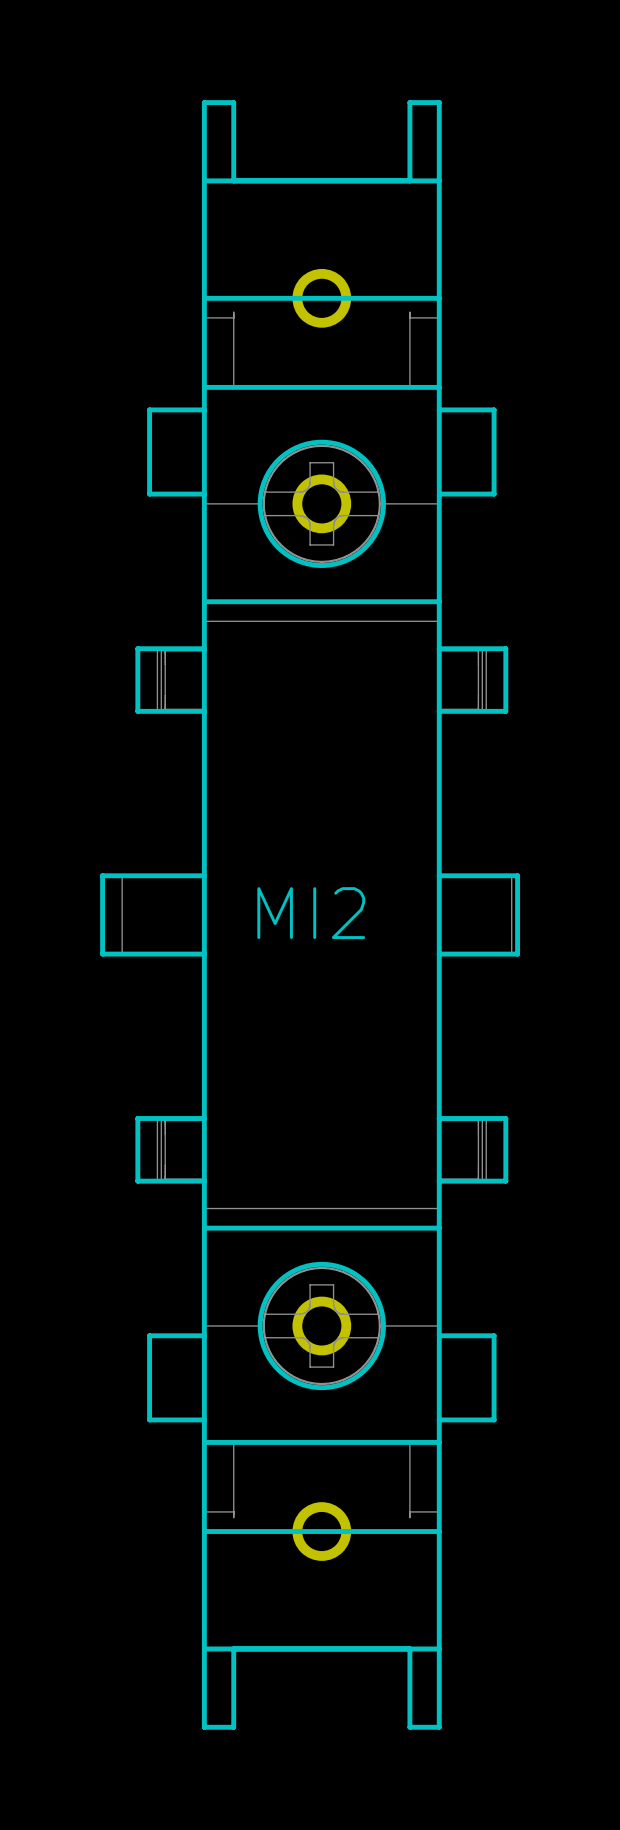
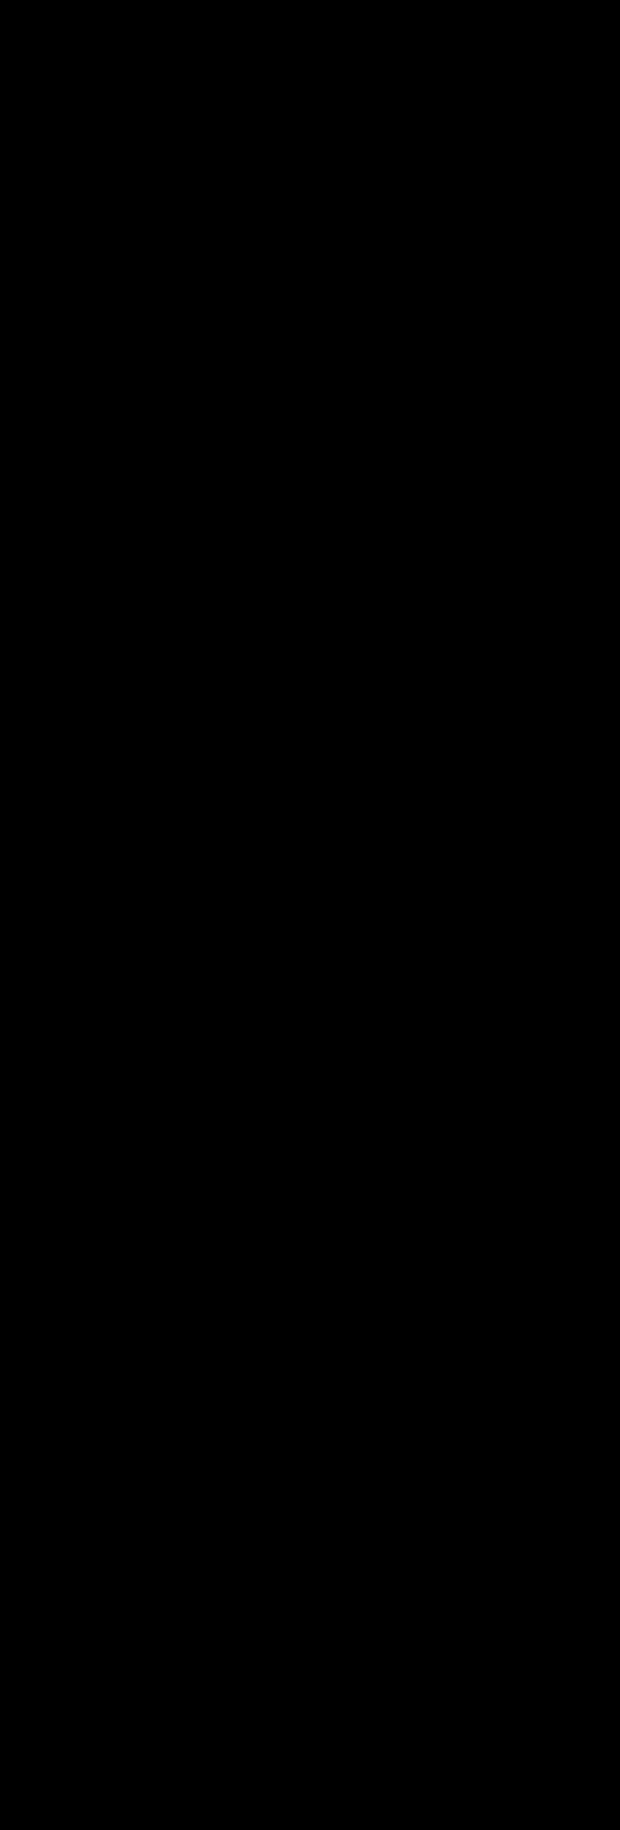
MI2: (310, 914) -> none

